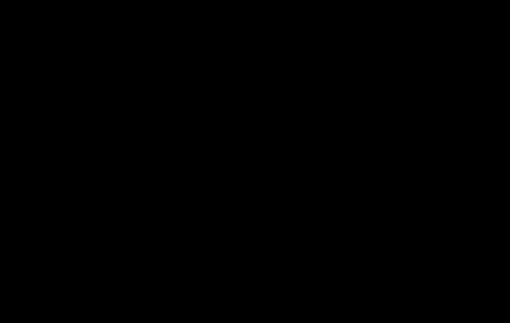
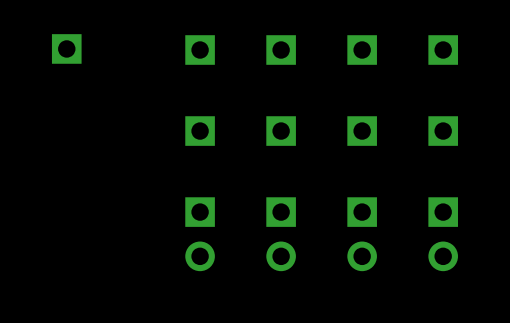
part: none -> (66, 48)
part: none -> (200, 50)
part: none -> (281, 50)
part: none -> (362, 50)
part: none -> (443, 50)
part: none -> (200, 131)
part: none -> (281, 131)
part: none -> (362, 131)
part: none -> (443, 131)
part: none -> (200, 234)
part: none -> (281, 234)
part: none -> (362, 234)
part: none -> (443, 234)

